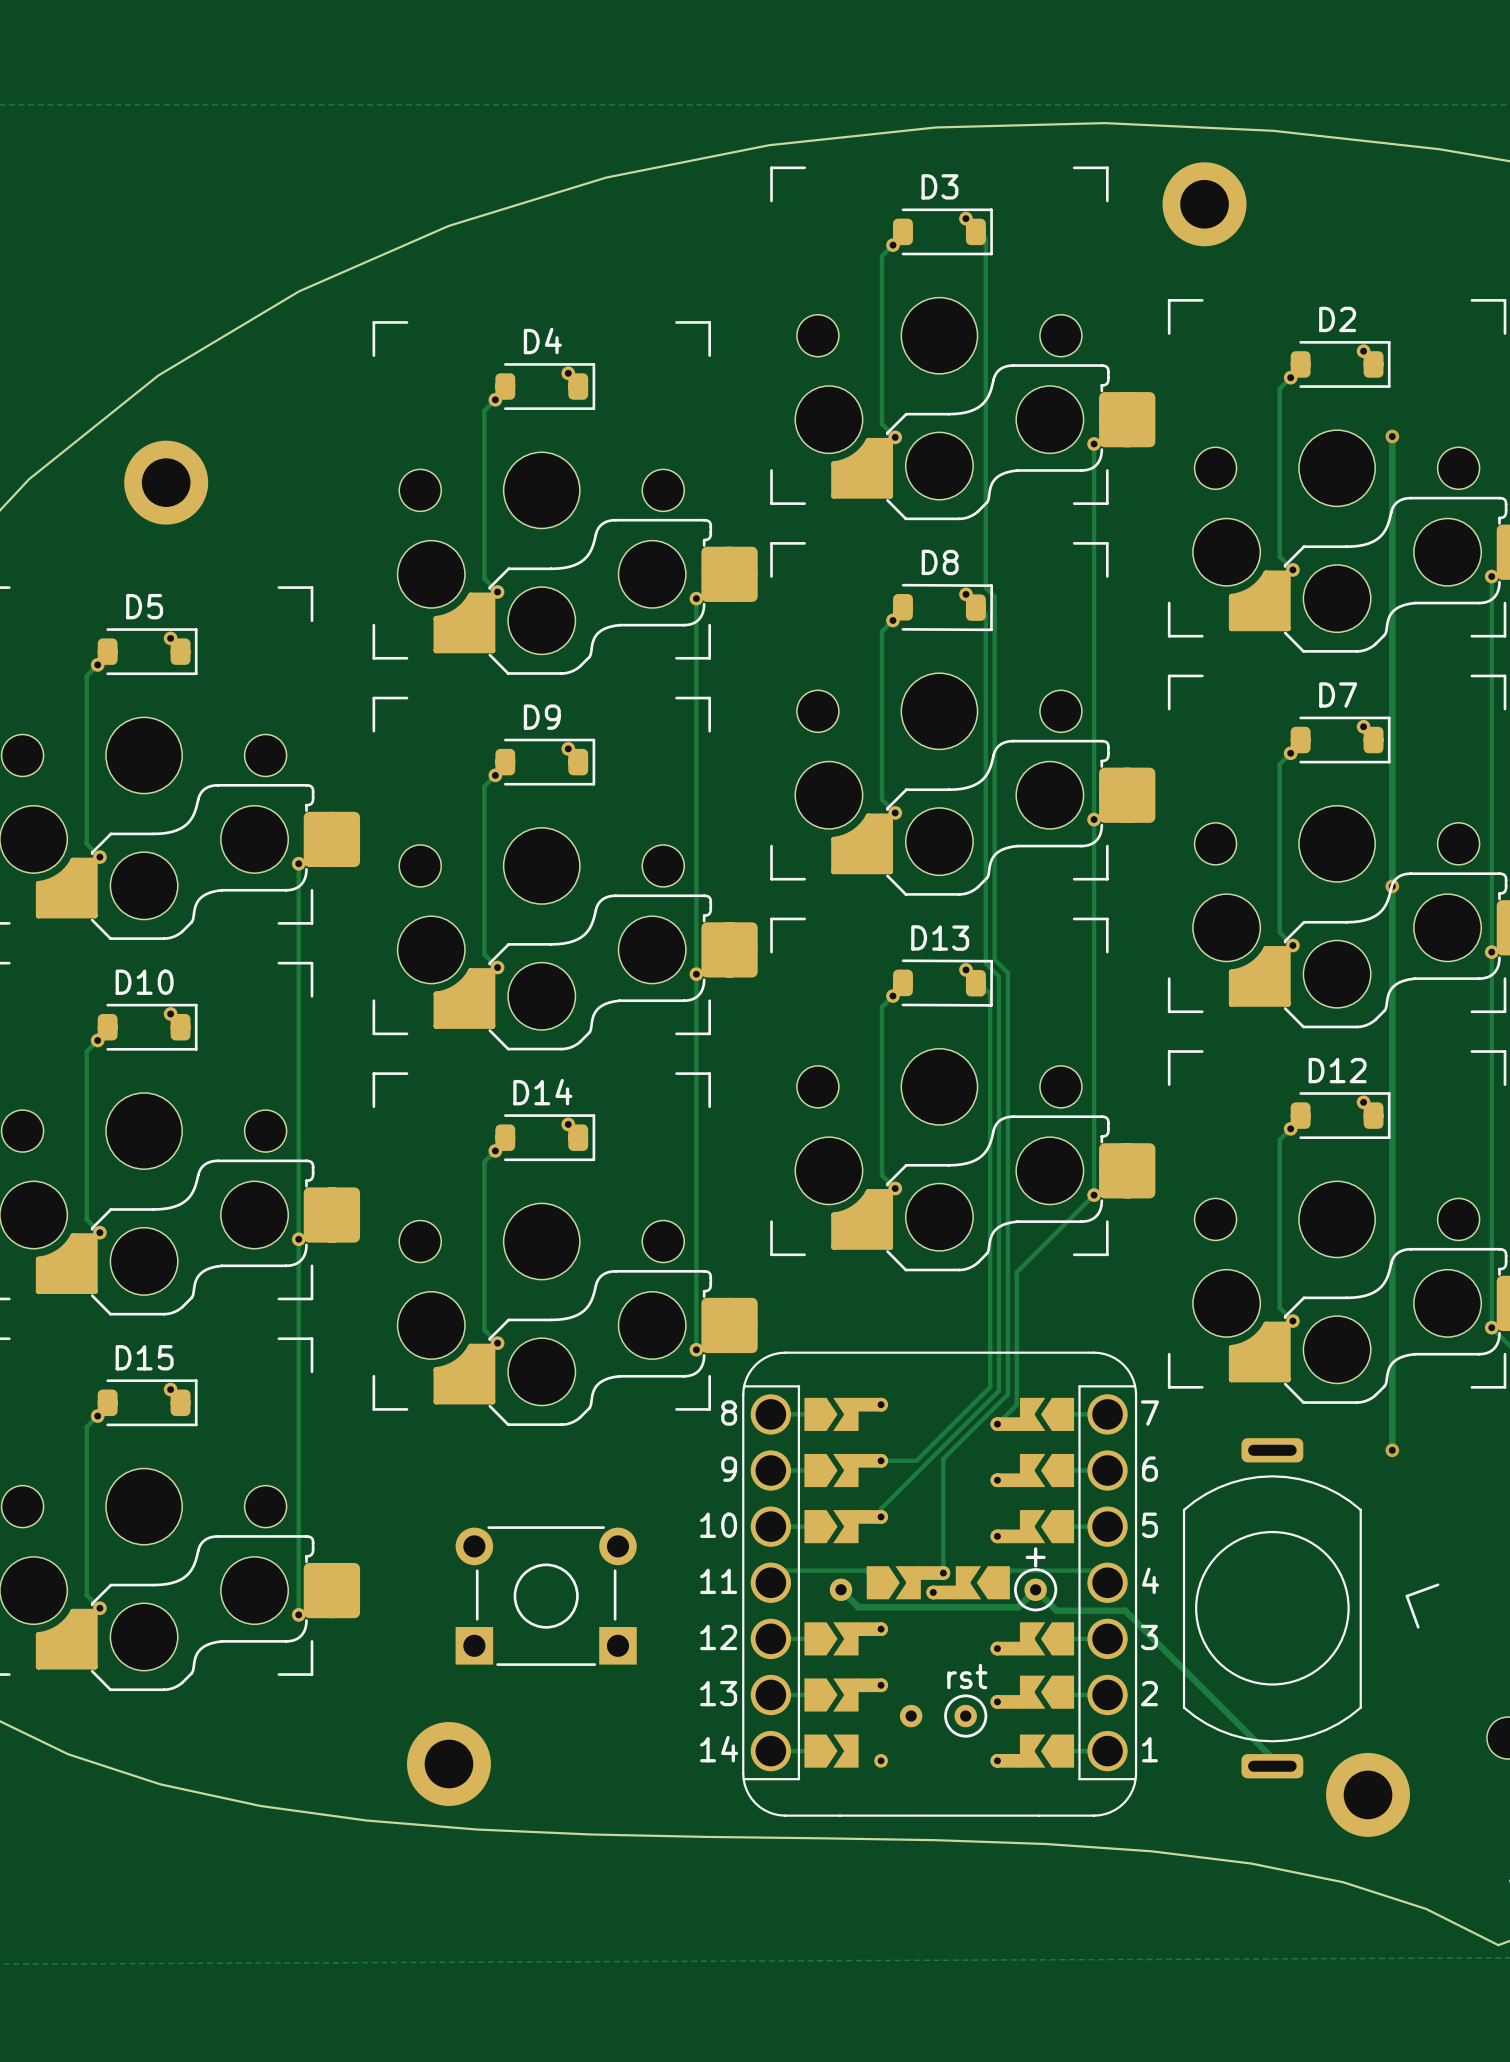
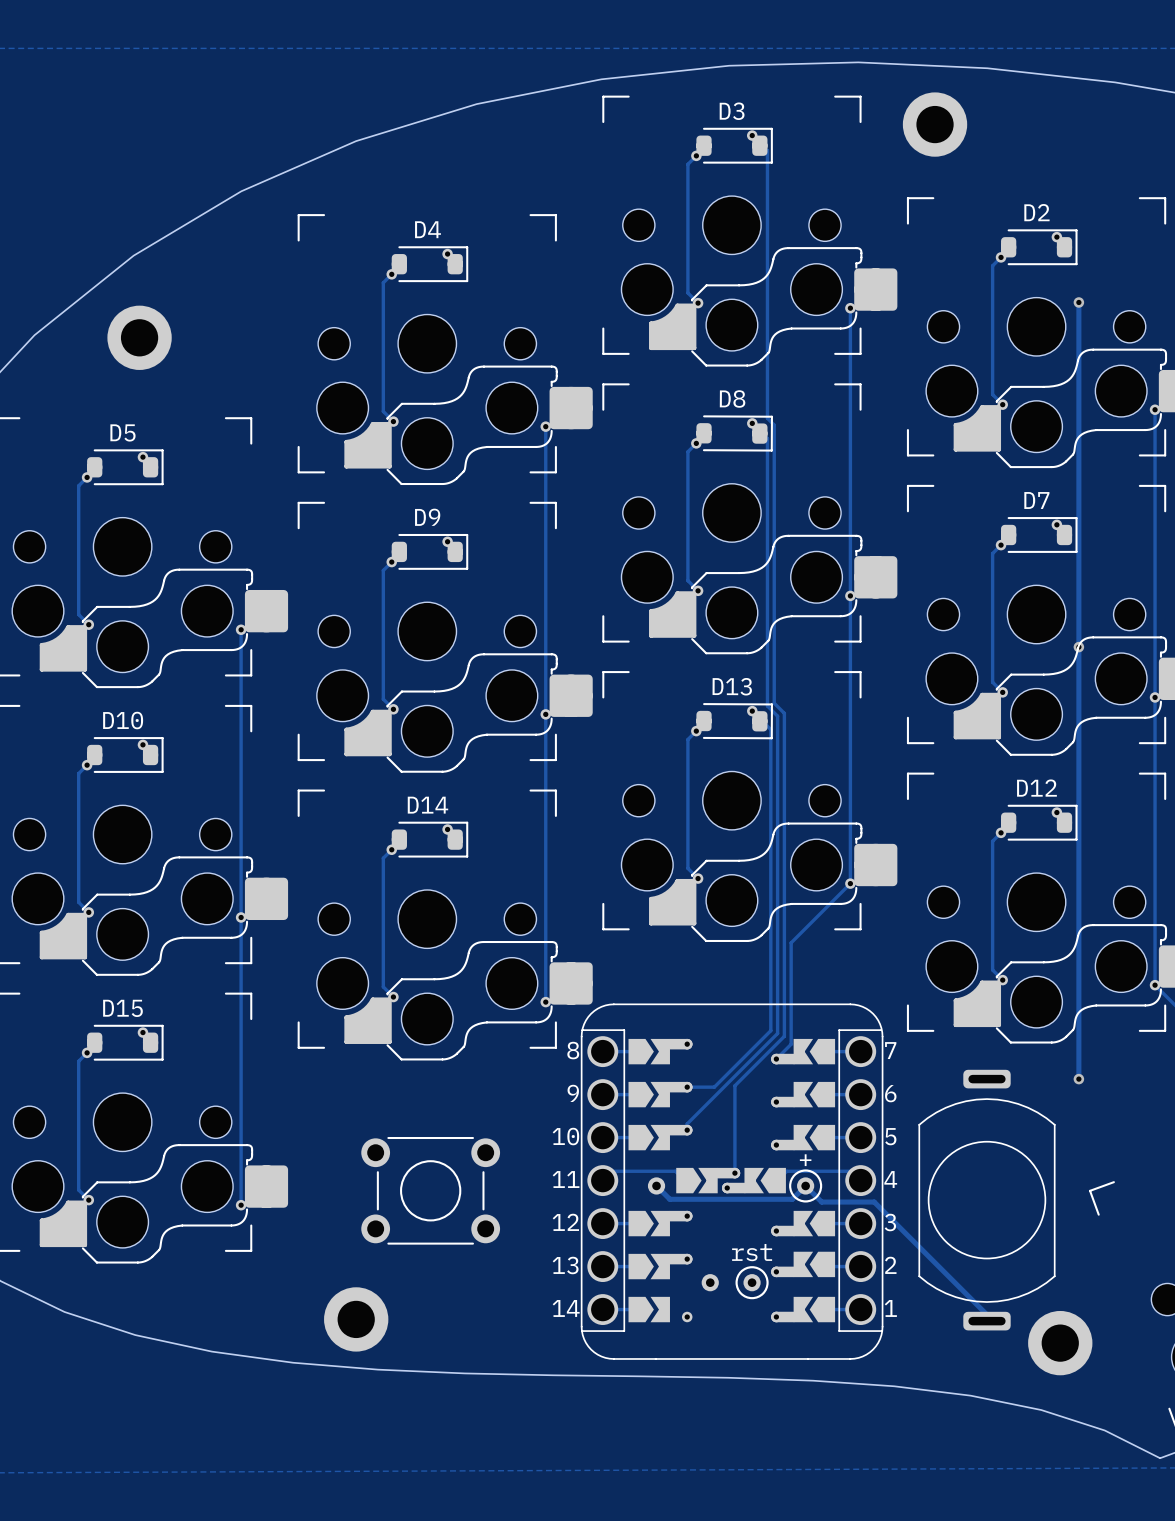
part footprint: [455, 1526, 637, 1666] -> [361, 1136, 501, 1245]

